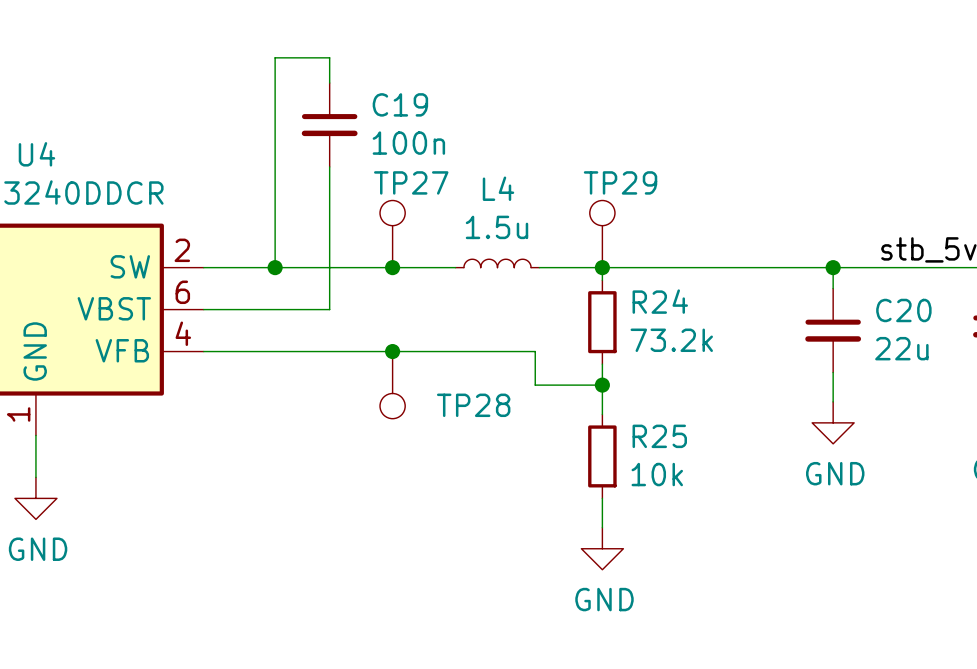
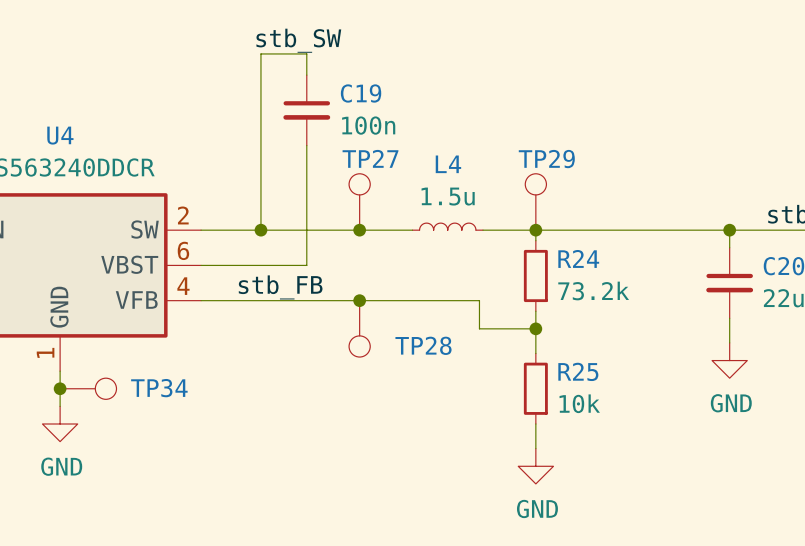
label: none -> stb_SW (298, 40)
label: none -> stb_FB (280, 287)
junction: none -> (60, 388)
TP34: none -> (88, 388)

